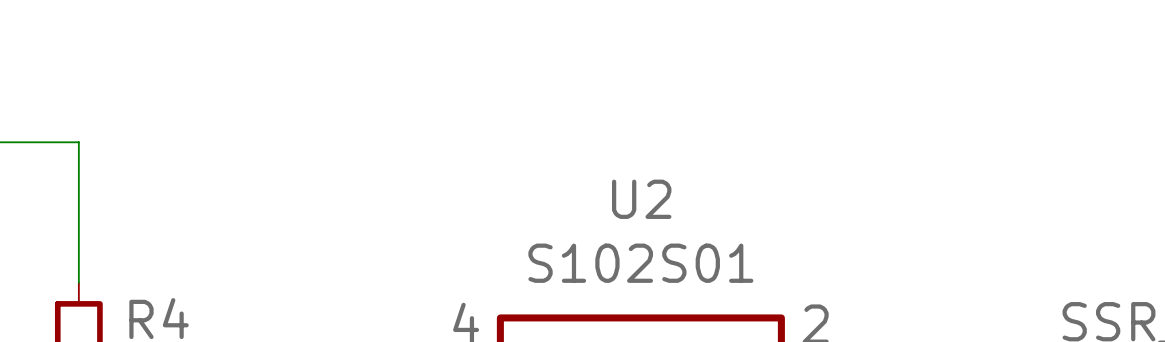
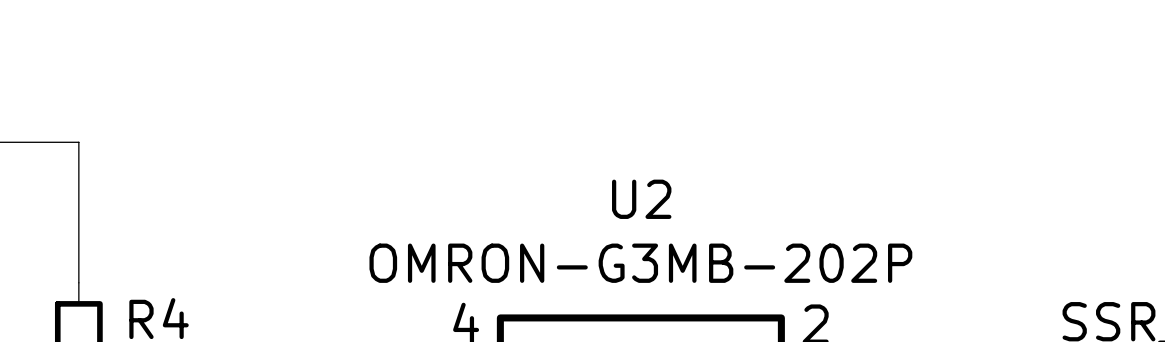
U2 value: S102S01 (640, 263) -> OMRON-G3MB-202P (640, 263)

